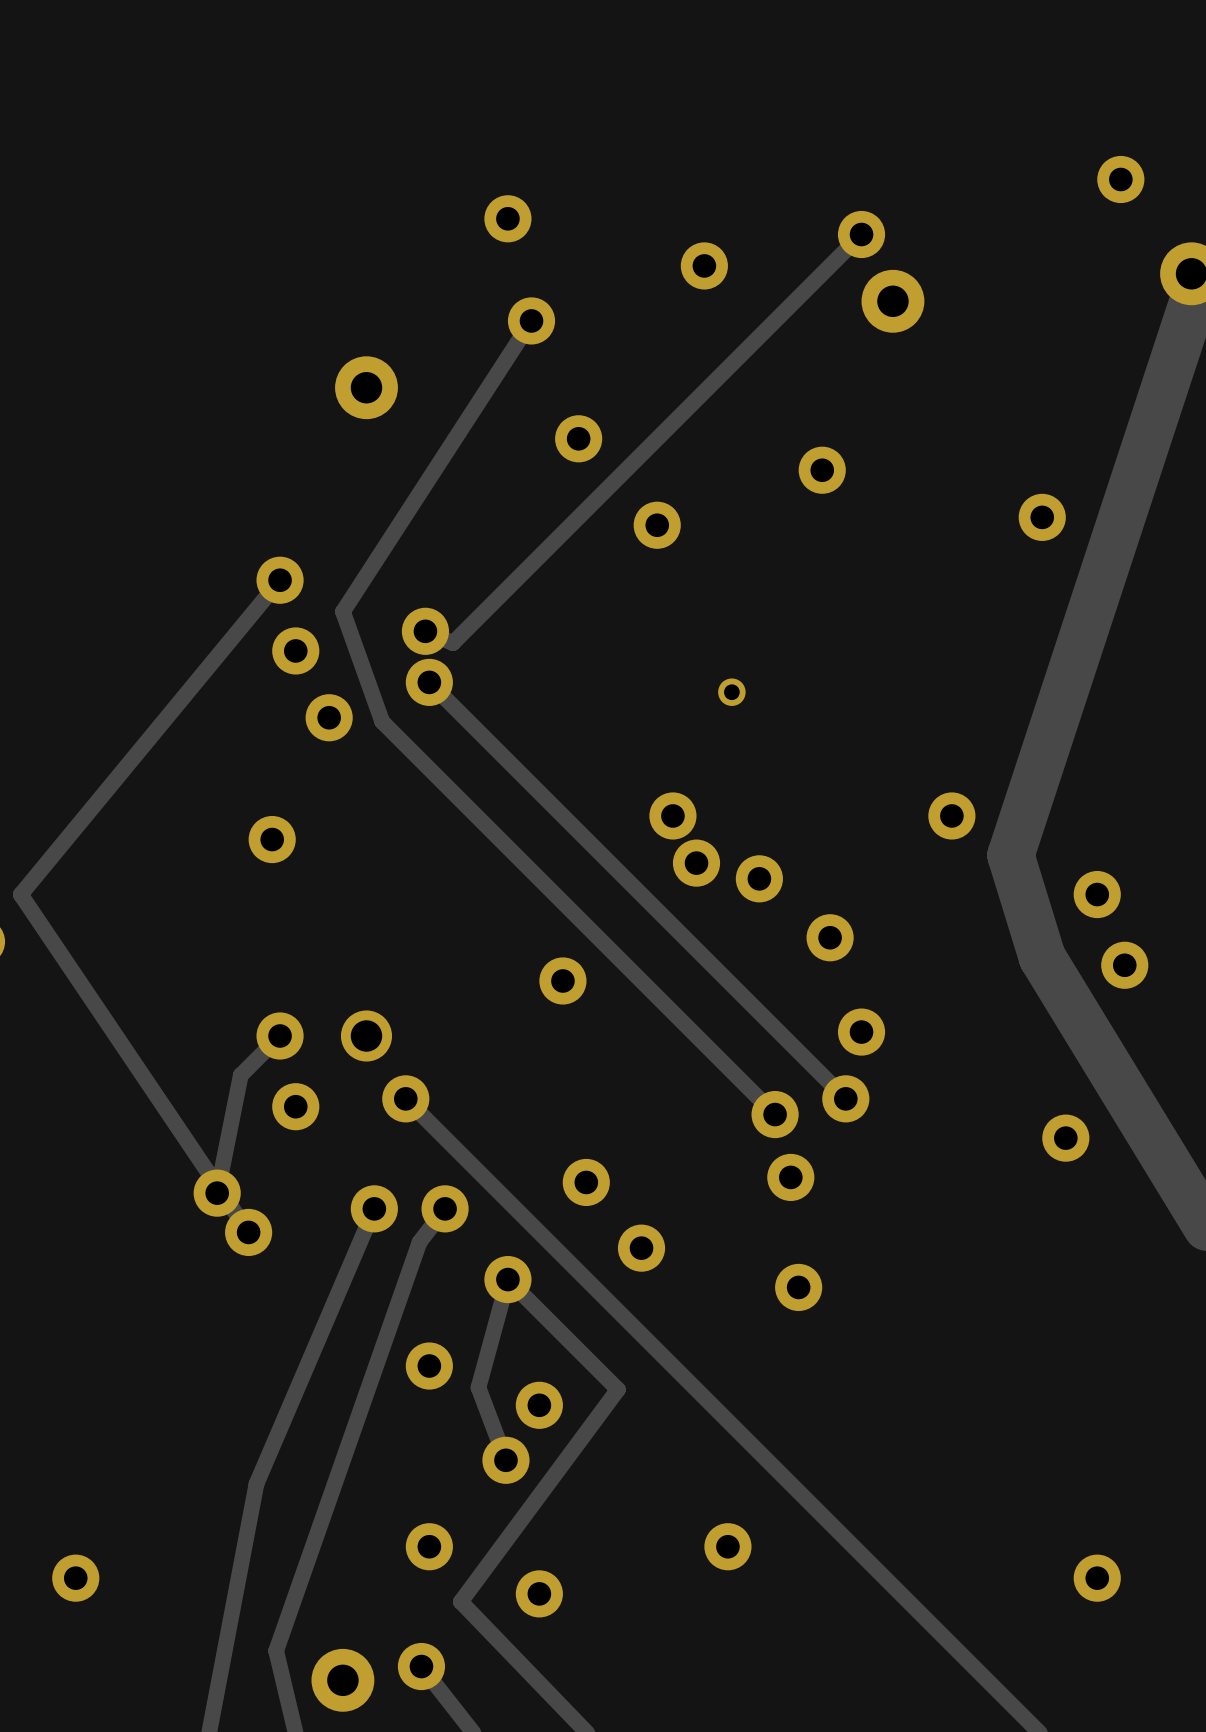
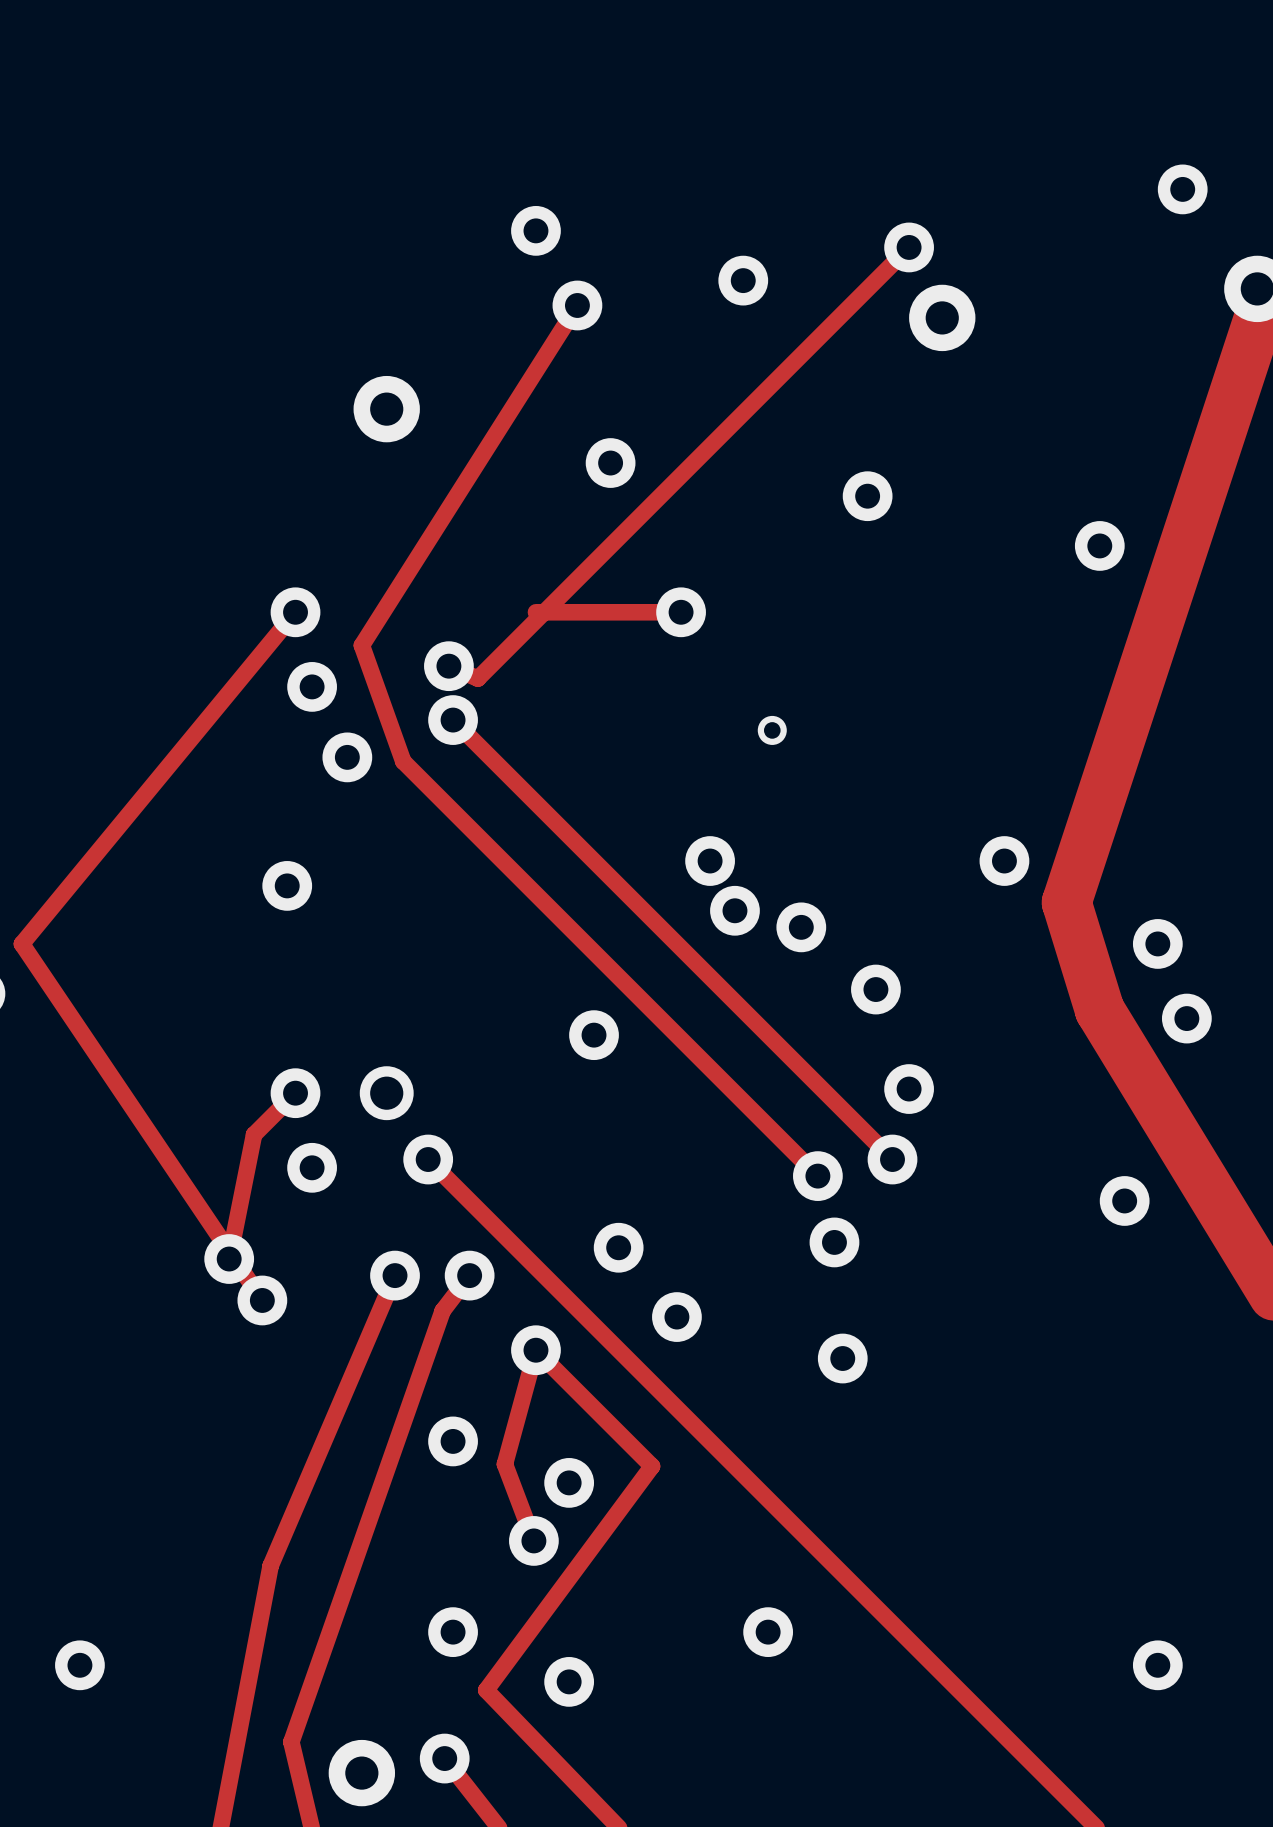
track: (531, 320) (342, 611) -> (577, 305) (361, 645)
via position: (531, 320) -> (577, 305)
via position: (657, 525) -> (681, 612)
track: none -> (535, 612) (681, 612)

